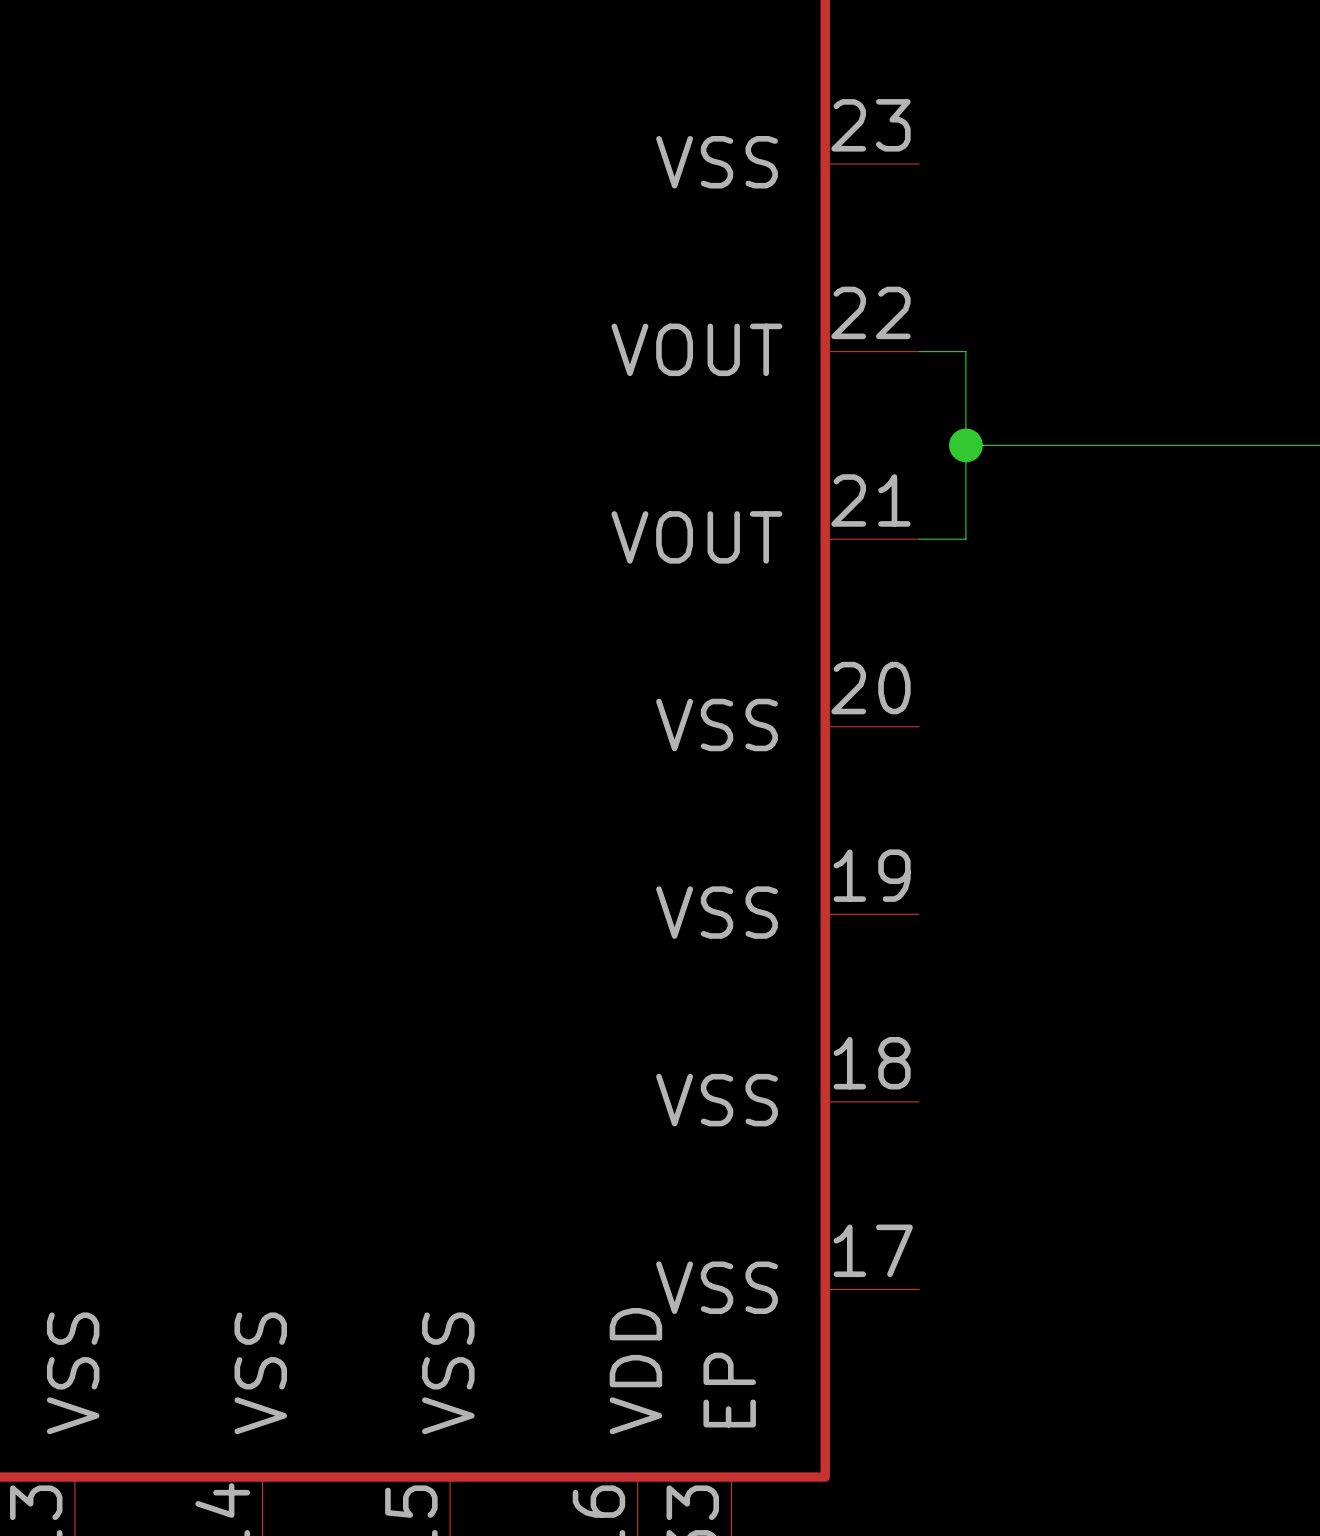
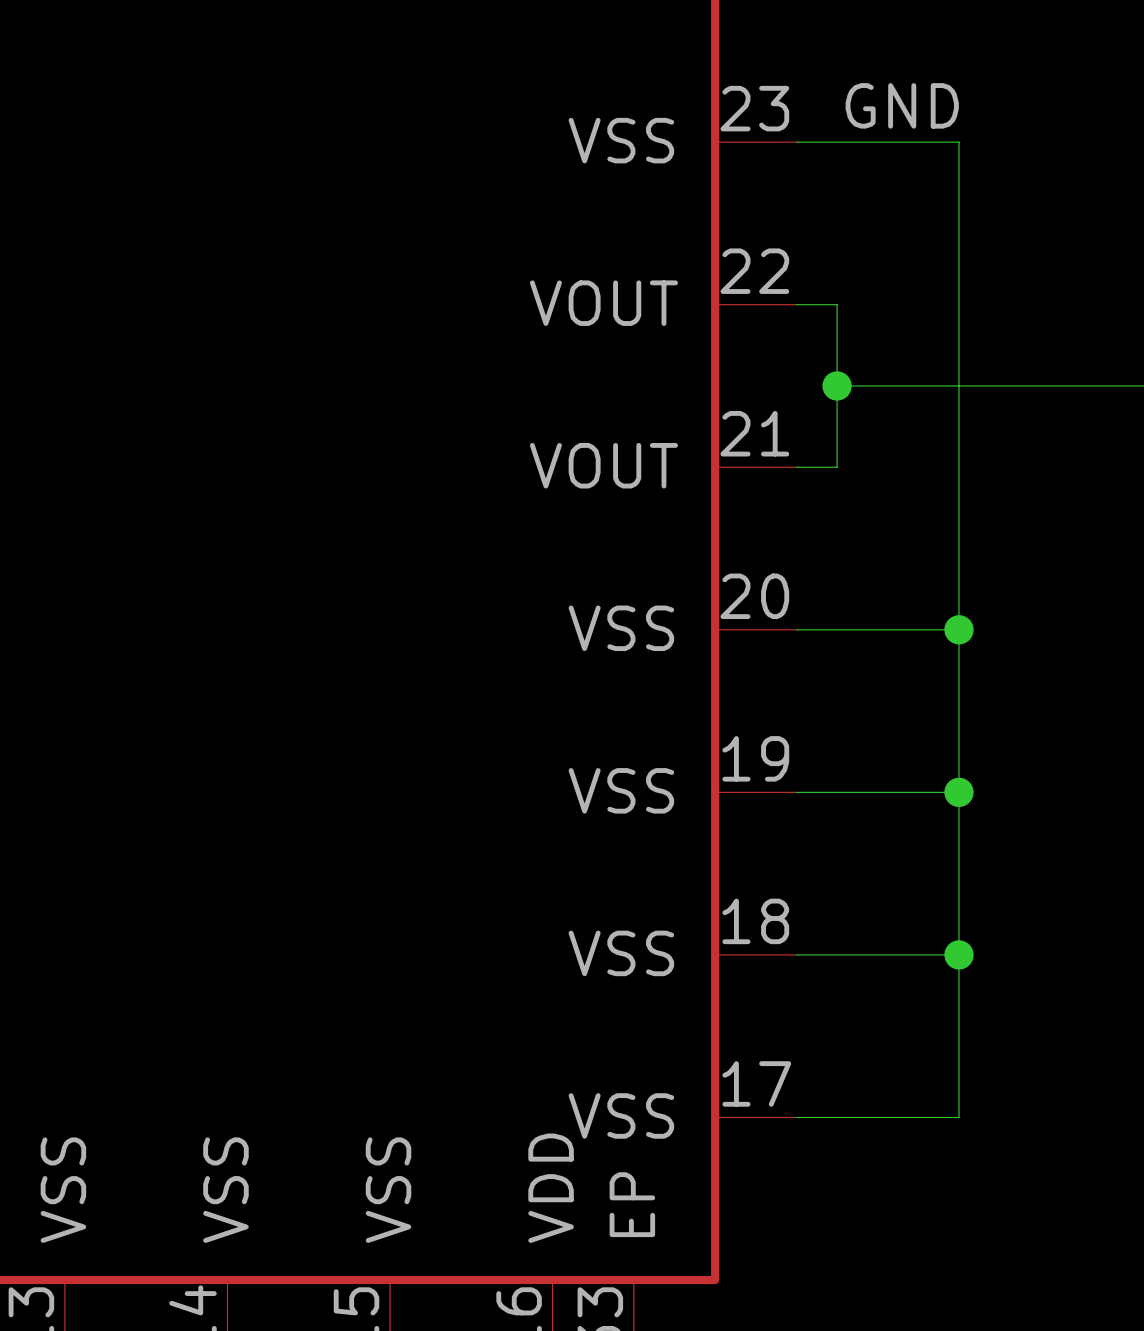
label: none -> GND (902, 105)
wire: none -> (796, 142) (958, 142) (958, 1117) (796, 1117)
wire: none -> (796, 629) (958, 629)
junction: none -> (958, 629)
wire: none -> (796, 792) (958, 792)
junction: none -> (958, 792)
wire: none -> (796, 954) (958, 954)
junction: none -> (958, 954)

